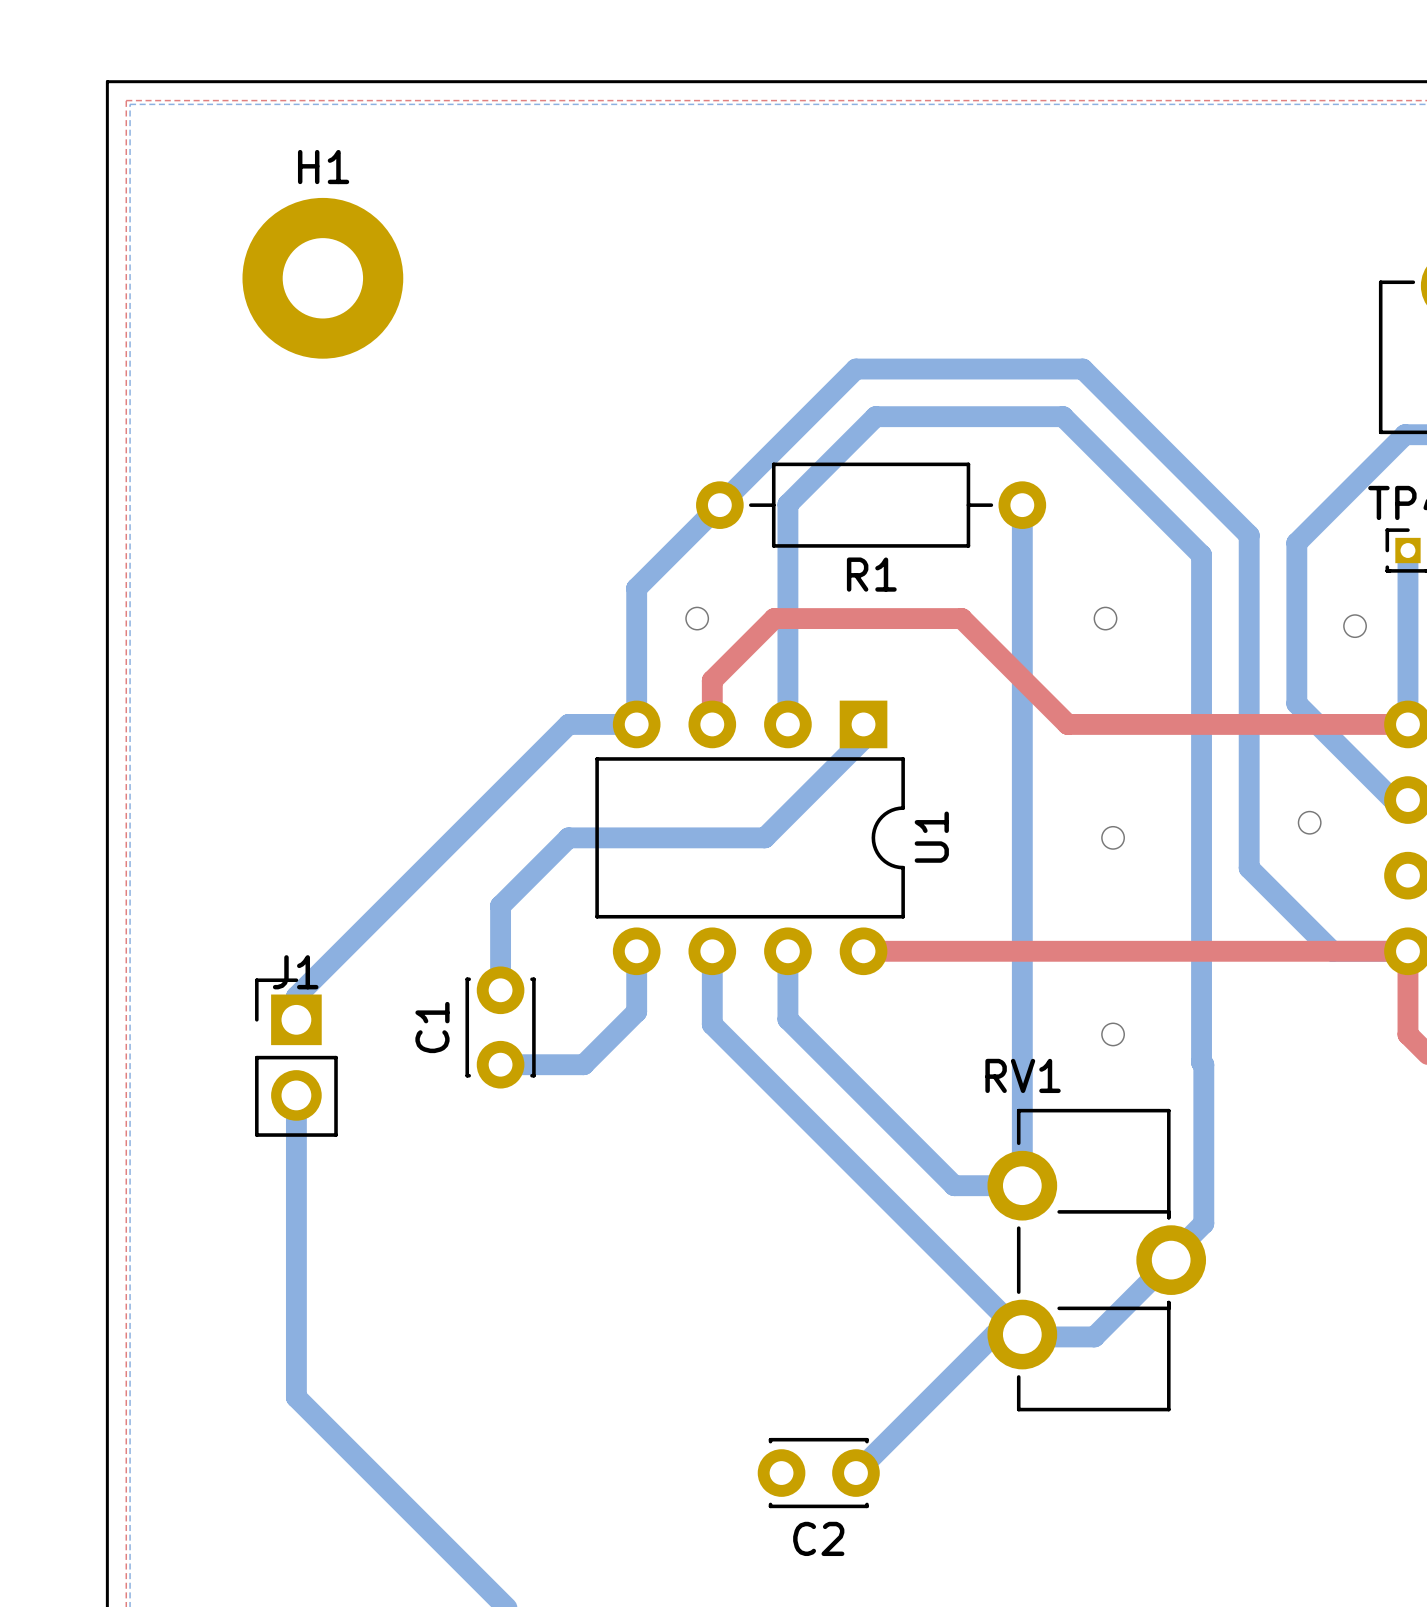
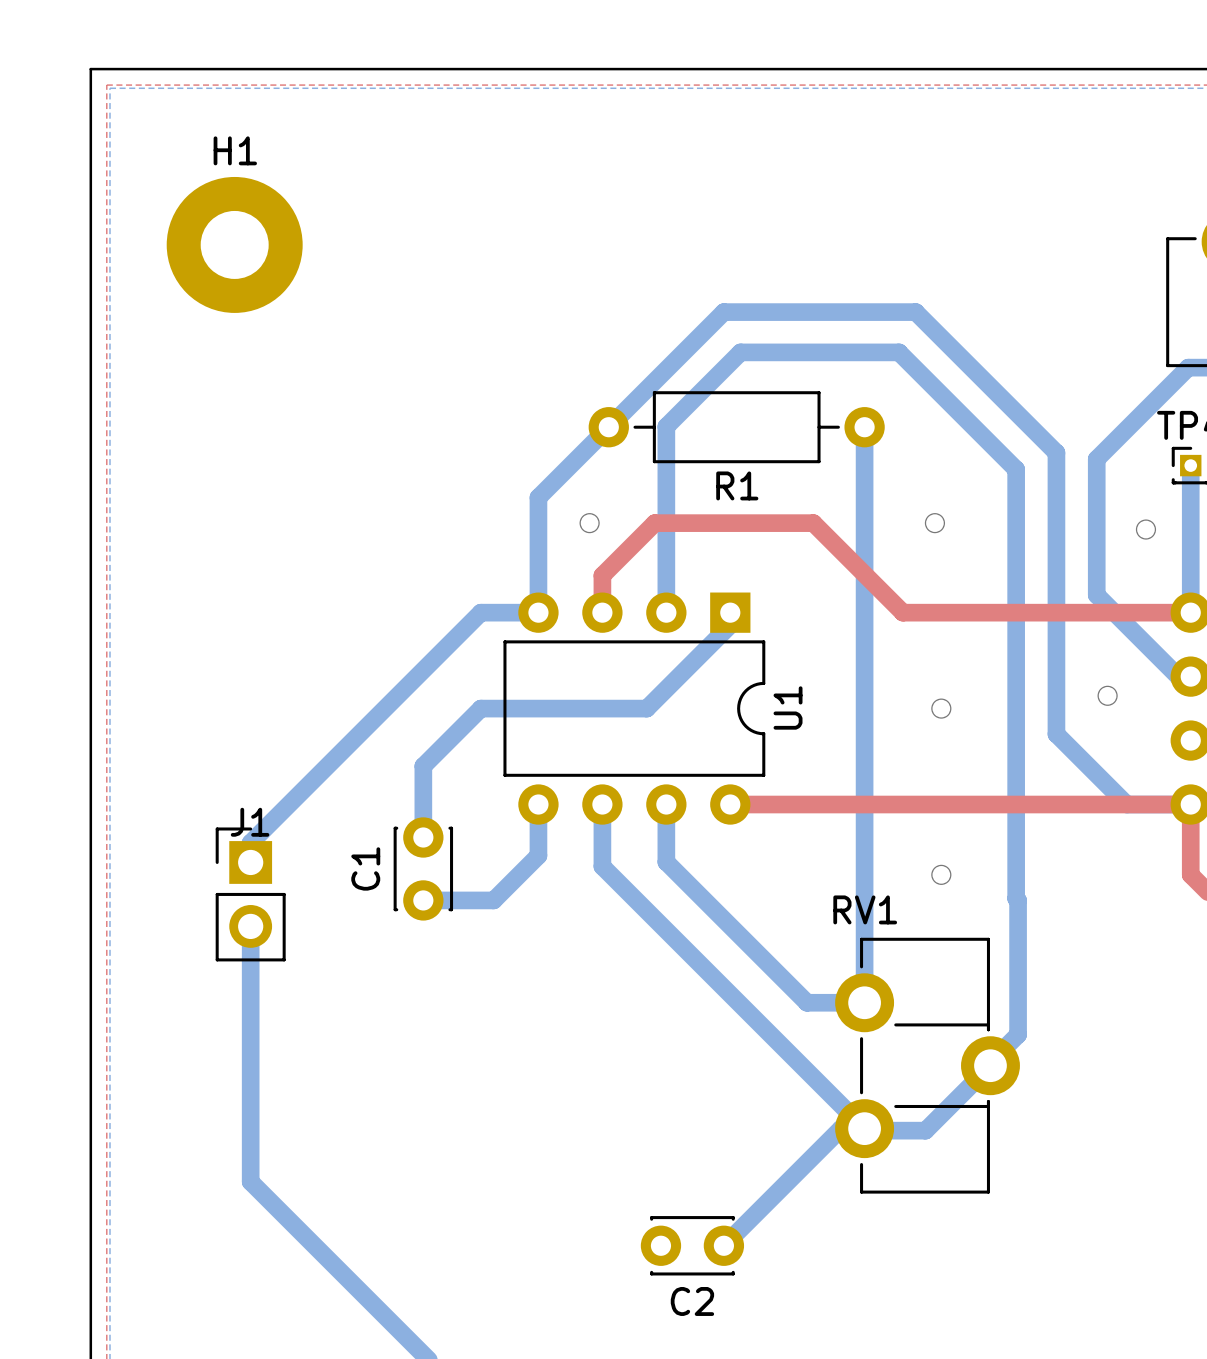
H1 position: (322, 278) -> (234, 244)

